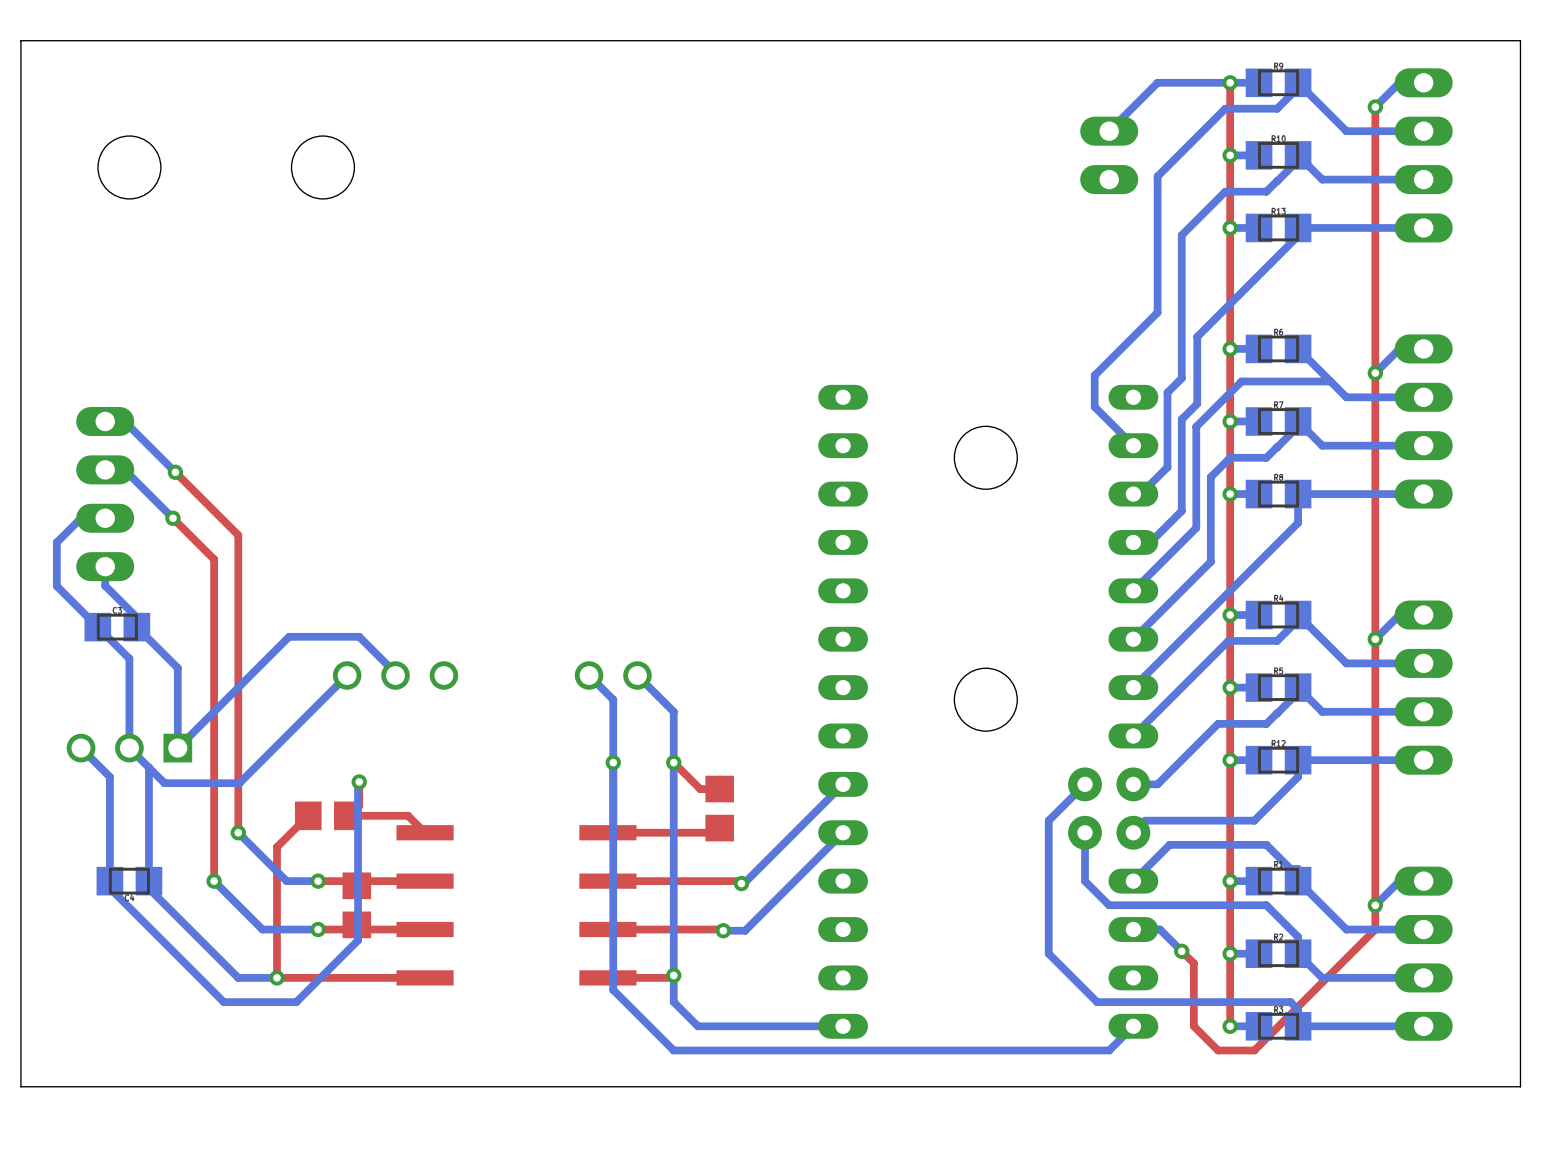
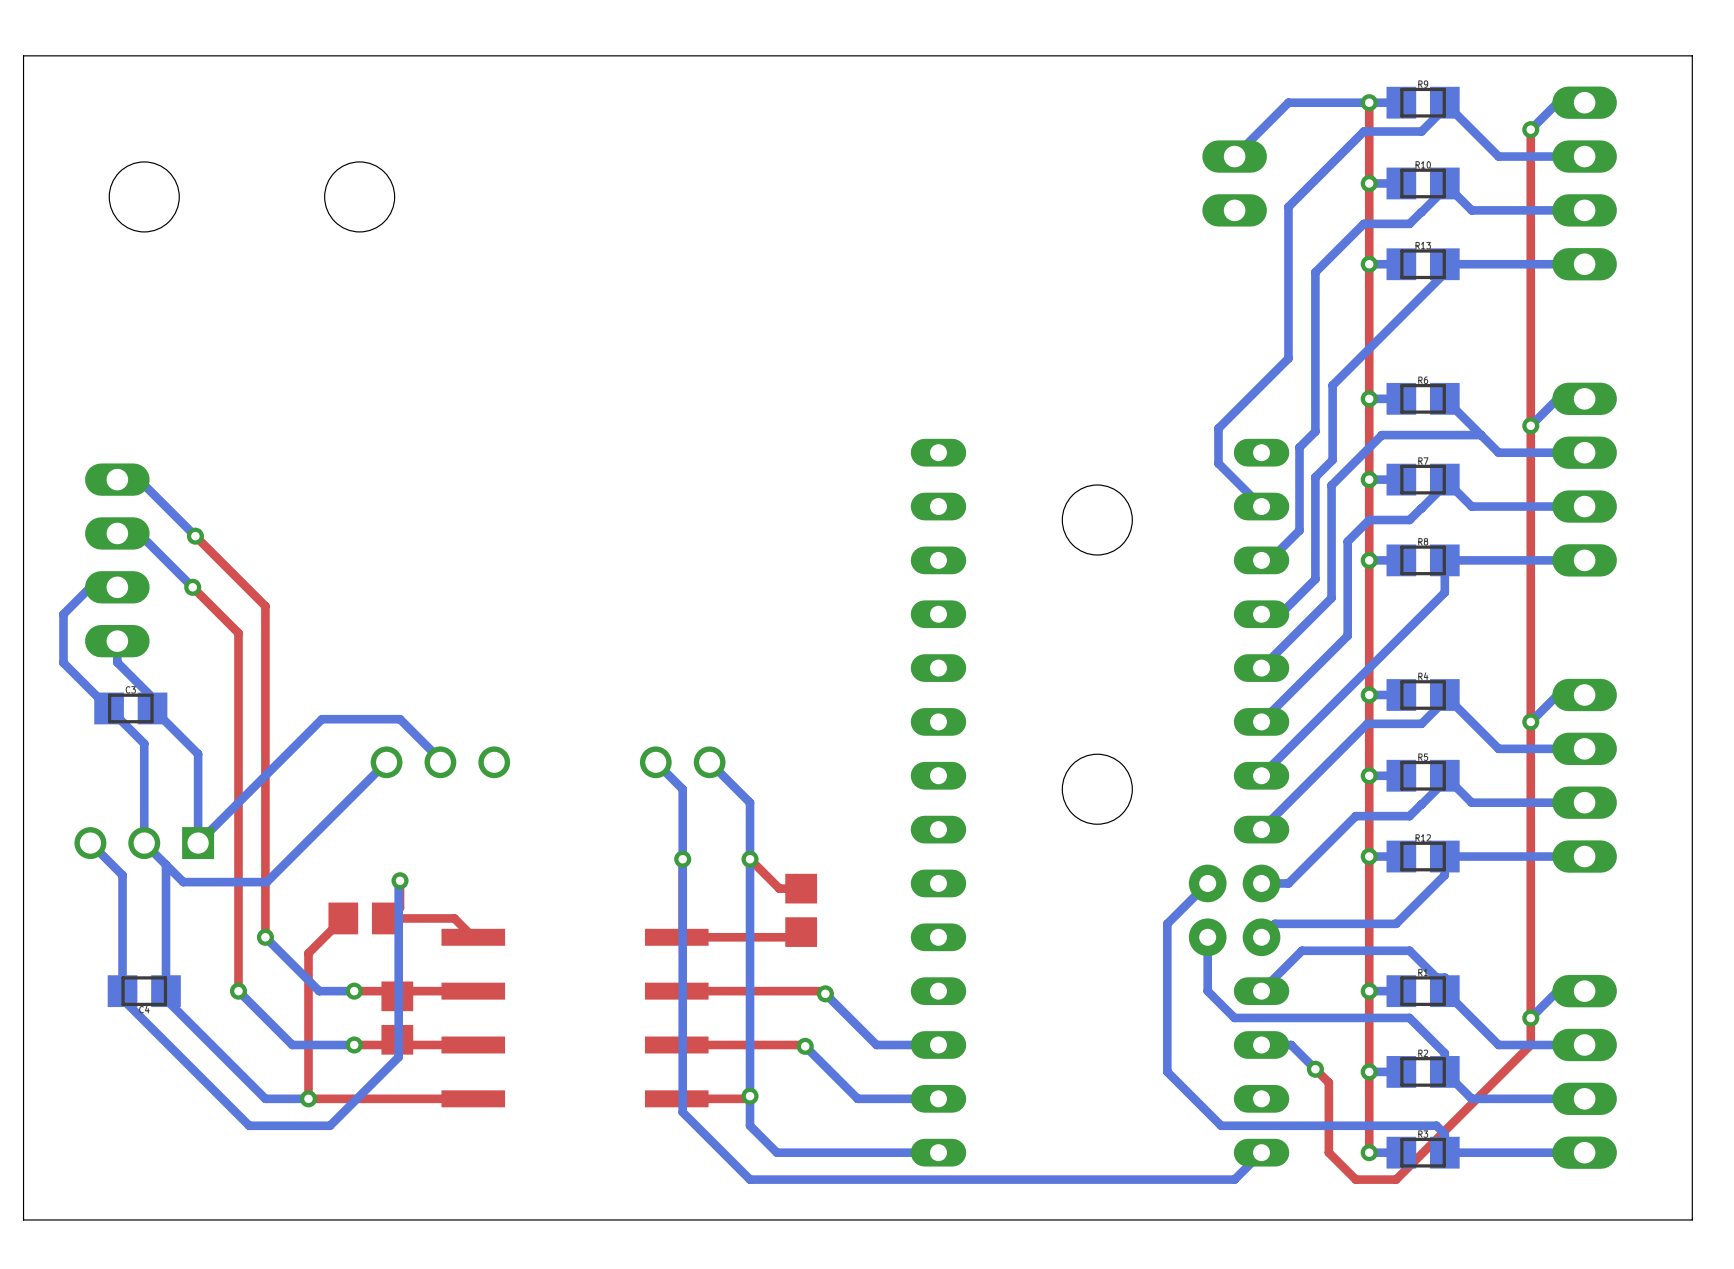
bottom track: (843, 784) (743, 883) (741, 883) -> (938, 1044) (876, 1044) (825, 993)
bottom track: (843, 832) (745, 930) (723, 930) -> (938, 1098) (857, 1098) (805, 1046)

